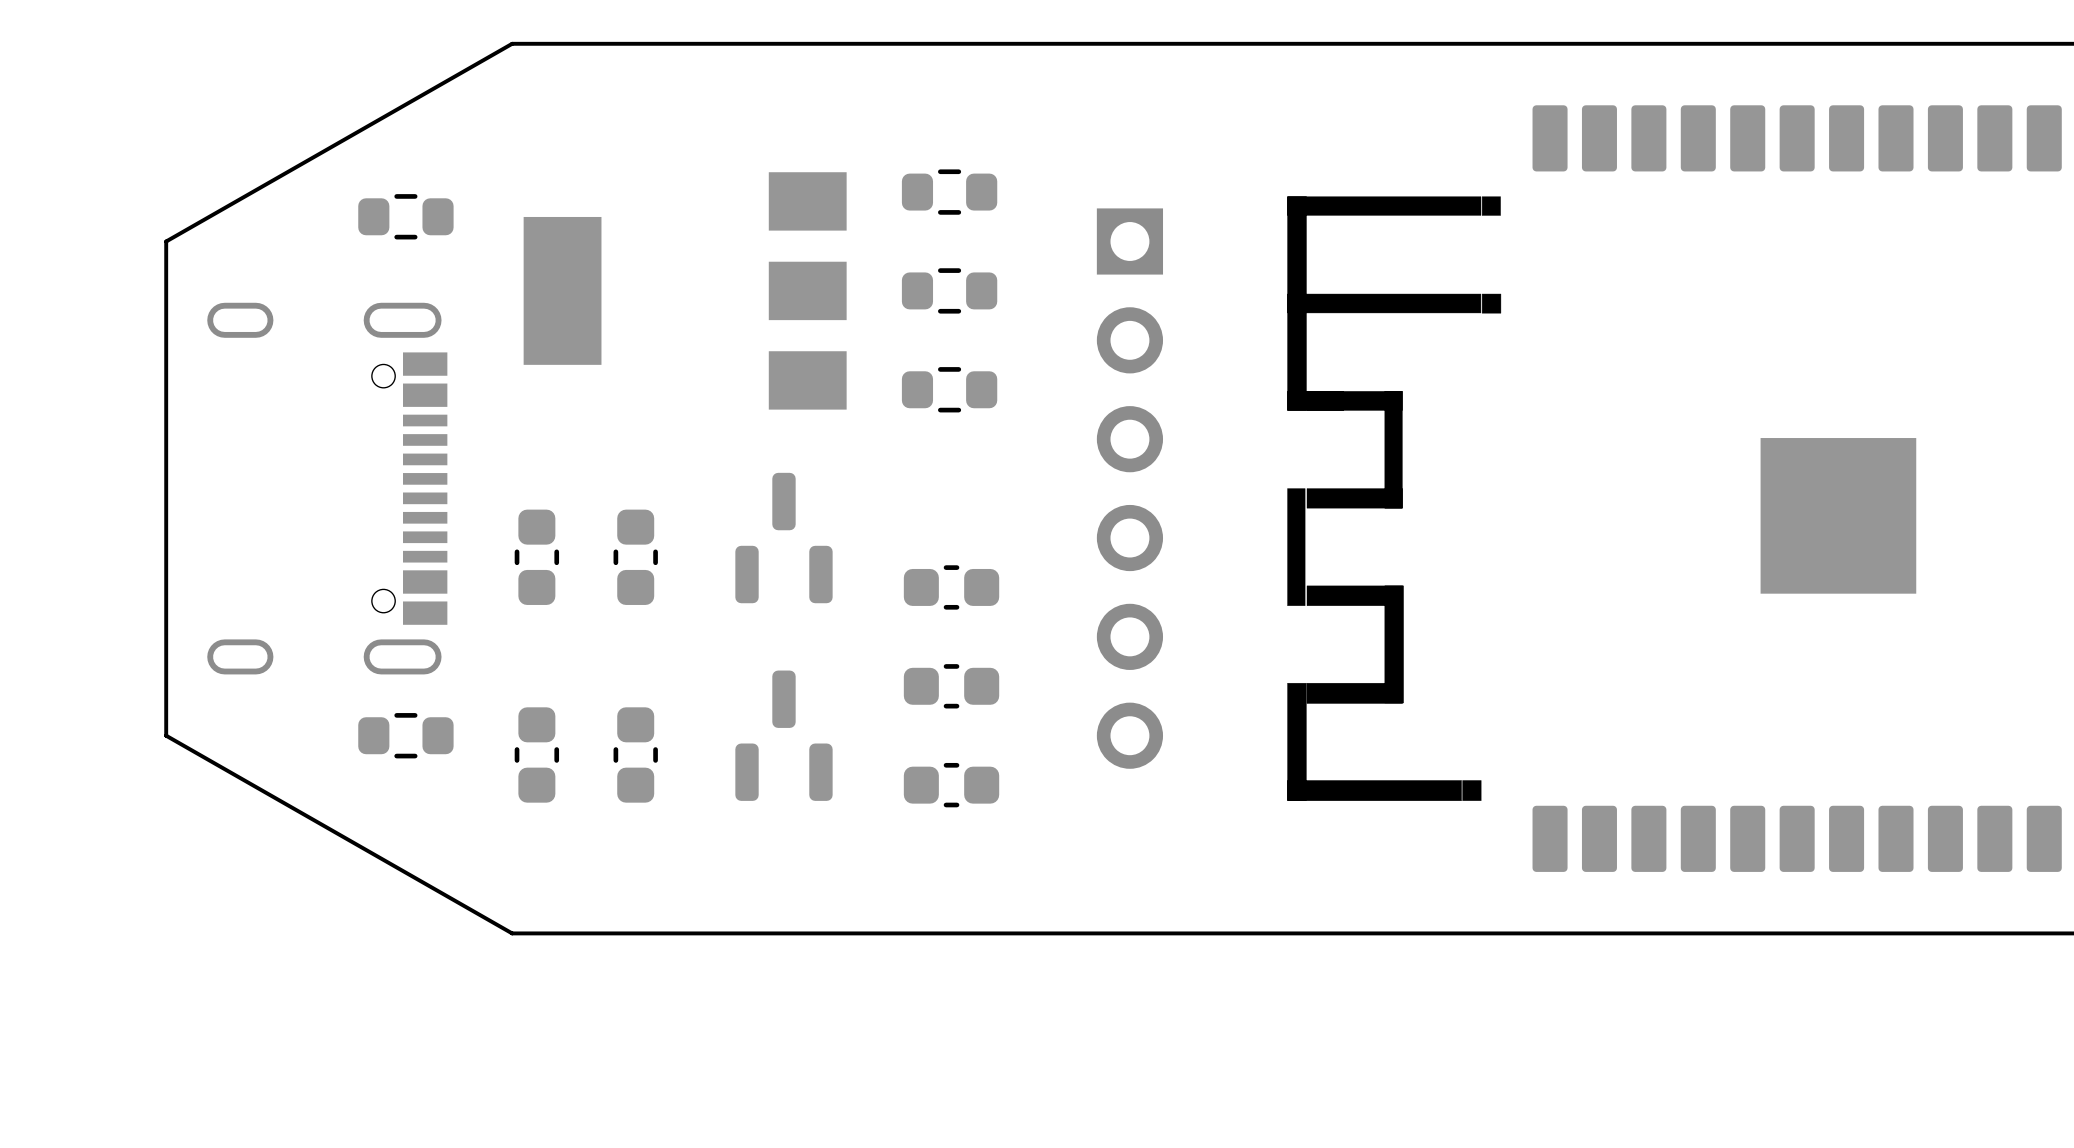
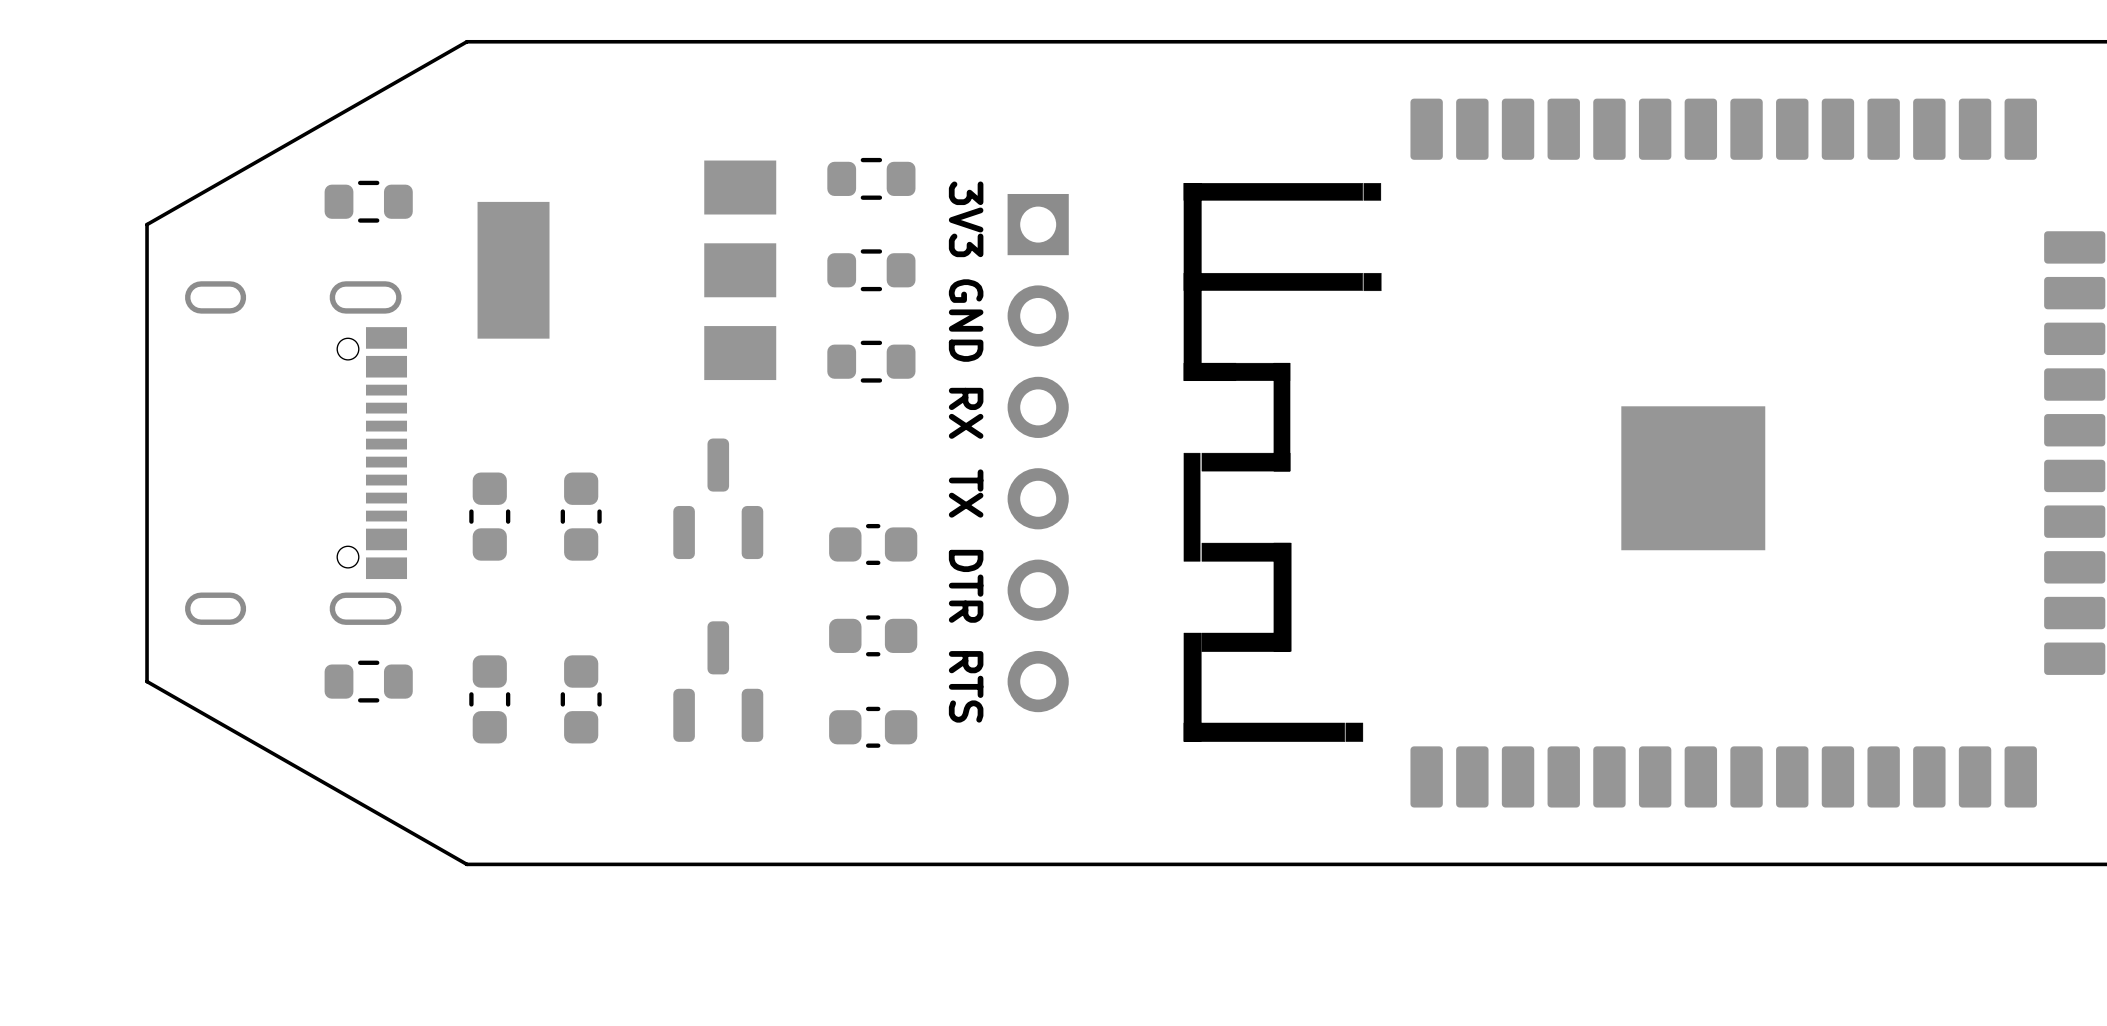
text: none -> 3V3 (966, 219)
text: none -> GND (966, 320)
text: none -> RX (966, 413)
text: none -> TX (966, 493)
text: none -> DTR (966, 586)
text: none -> RTS (966, 686)

